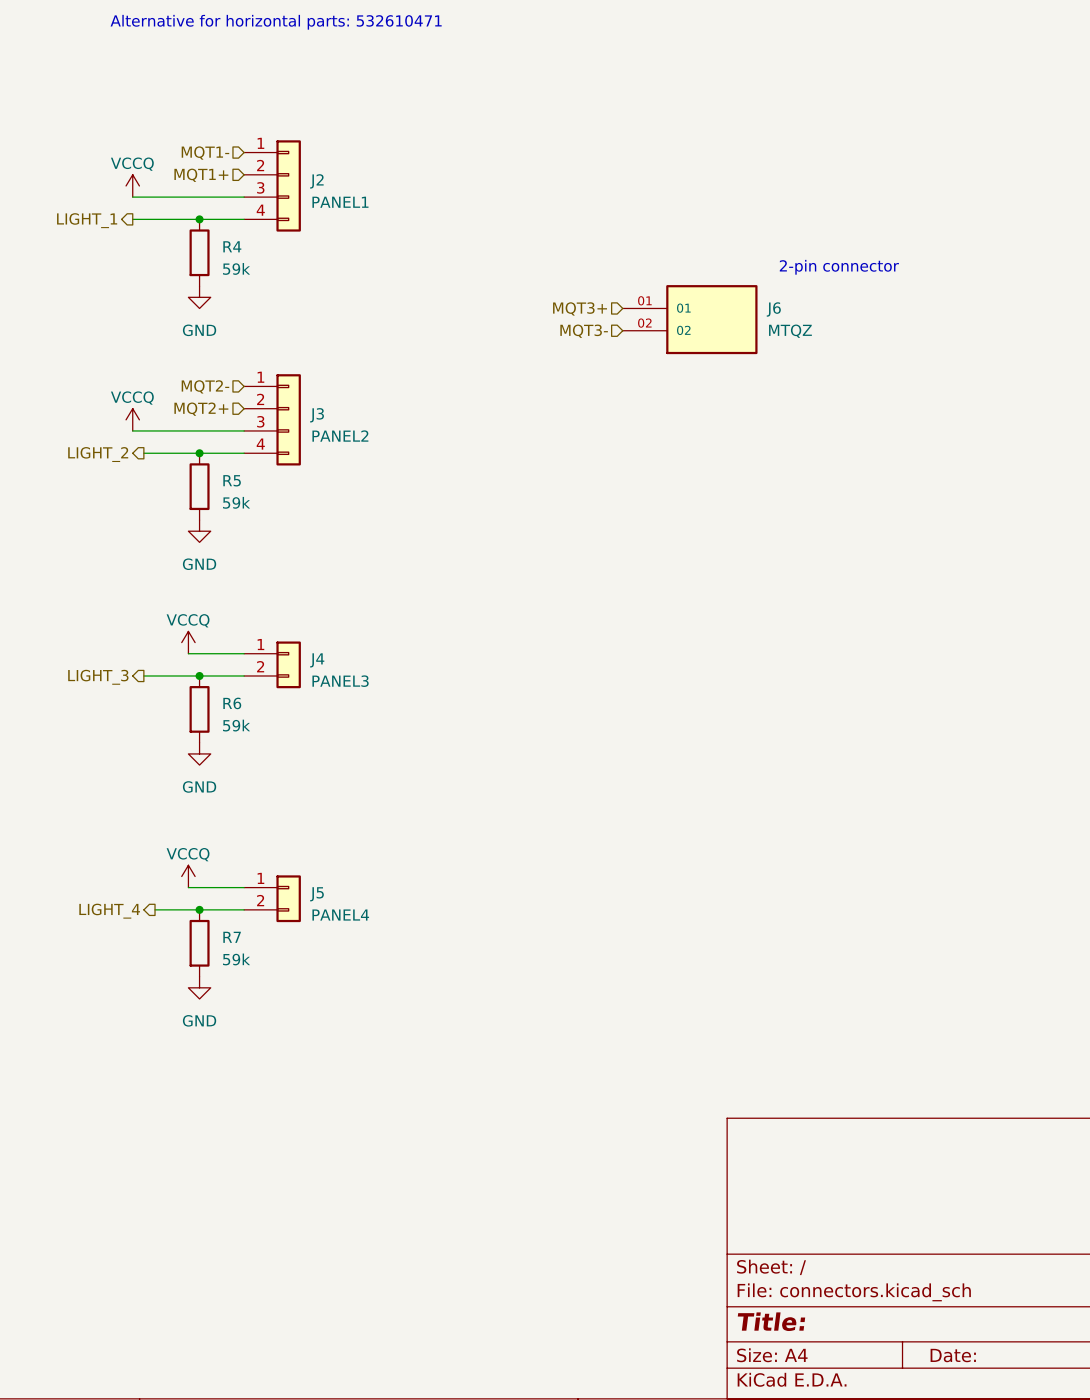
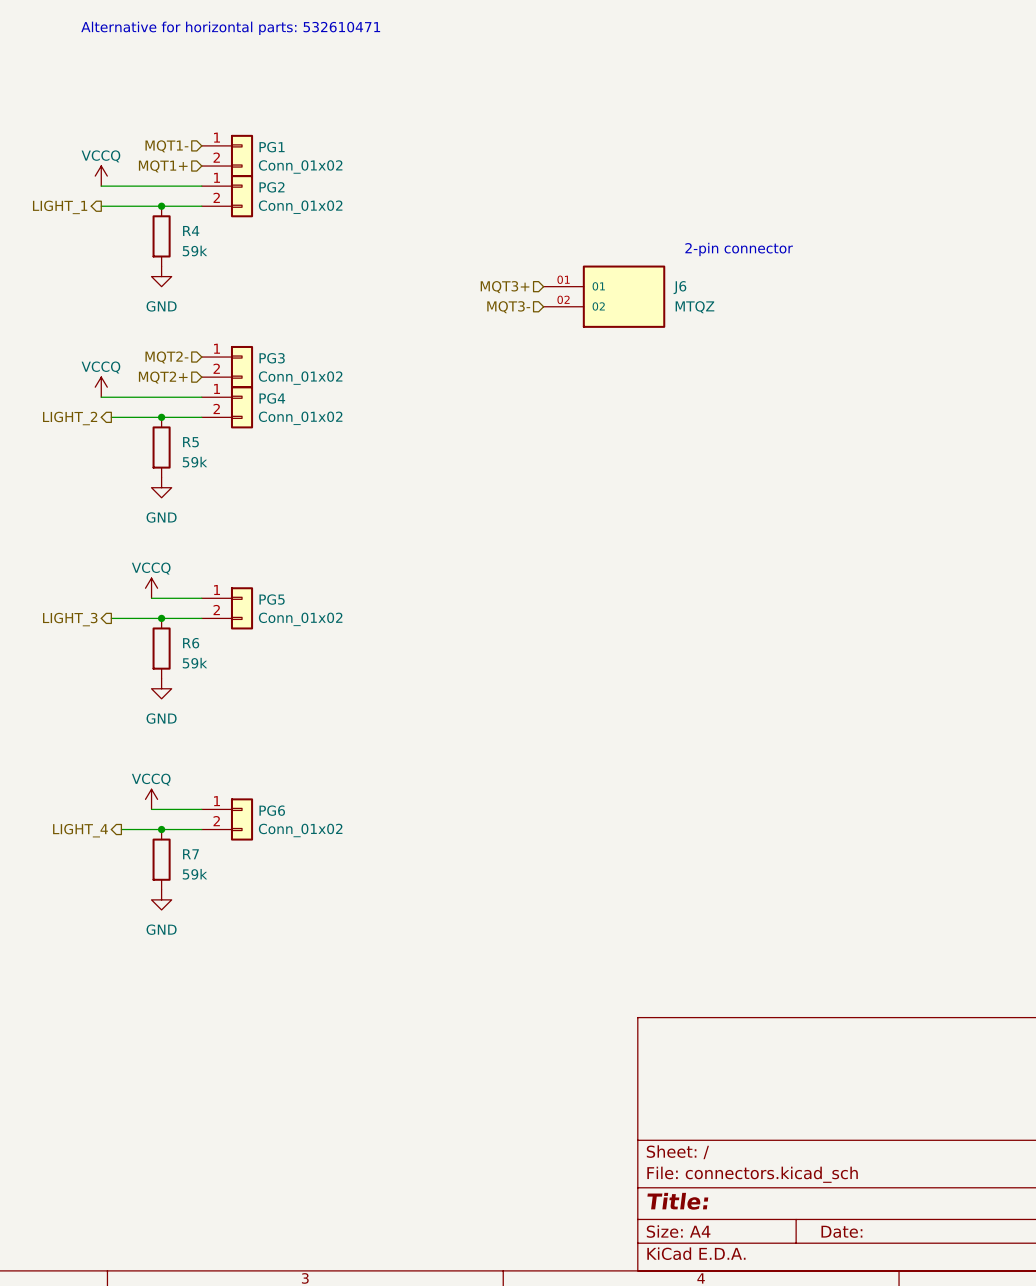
PG1: none -> Conn_01x02 (227, 155)
J2: PANEL1 (272, 185) -> none
PG2: none -> Conn_01x02 (227, 196)
PG3: none -> Conn_01x02 (227, 367)
J3: PANEL2 (272, 419) -> none
PG4: none -> Conn_01x02 (227, 407)
J4 name: J4 (317, 660) -> PG5 (272, 599)
J4 value: PANEL3 (340, 681) -> Conn_01x02 (300, 619)
J5 name: J5 (316, 894) -> PG6 (272, 810)
J5 value: PANEL4 (340, 915) -> Conn_01x02 (300, 830)

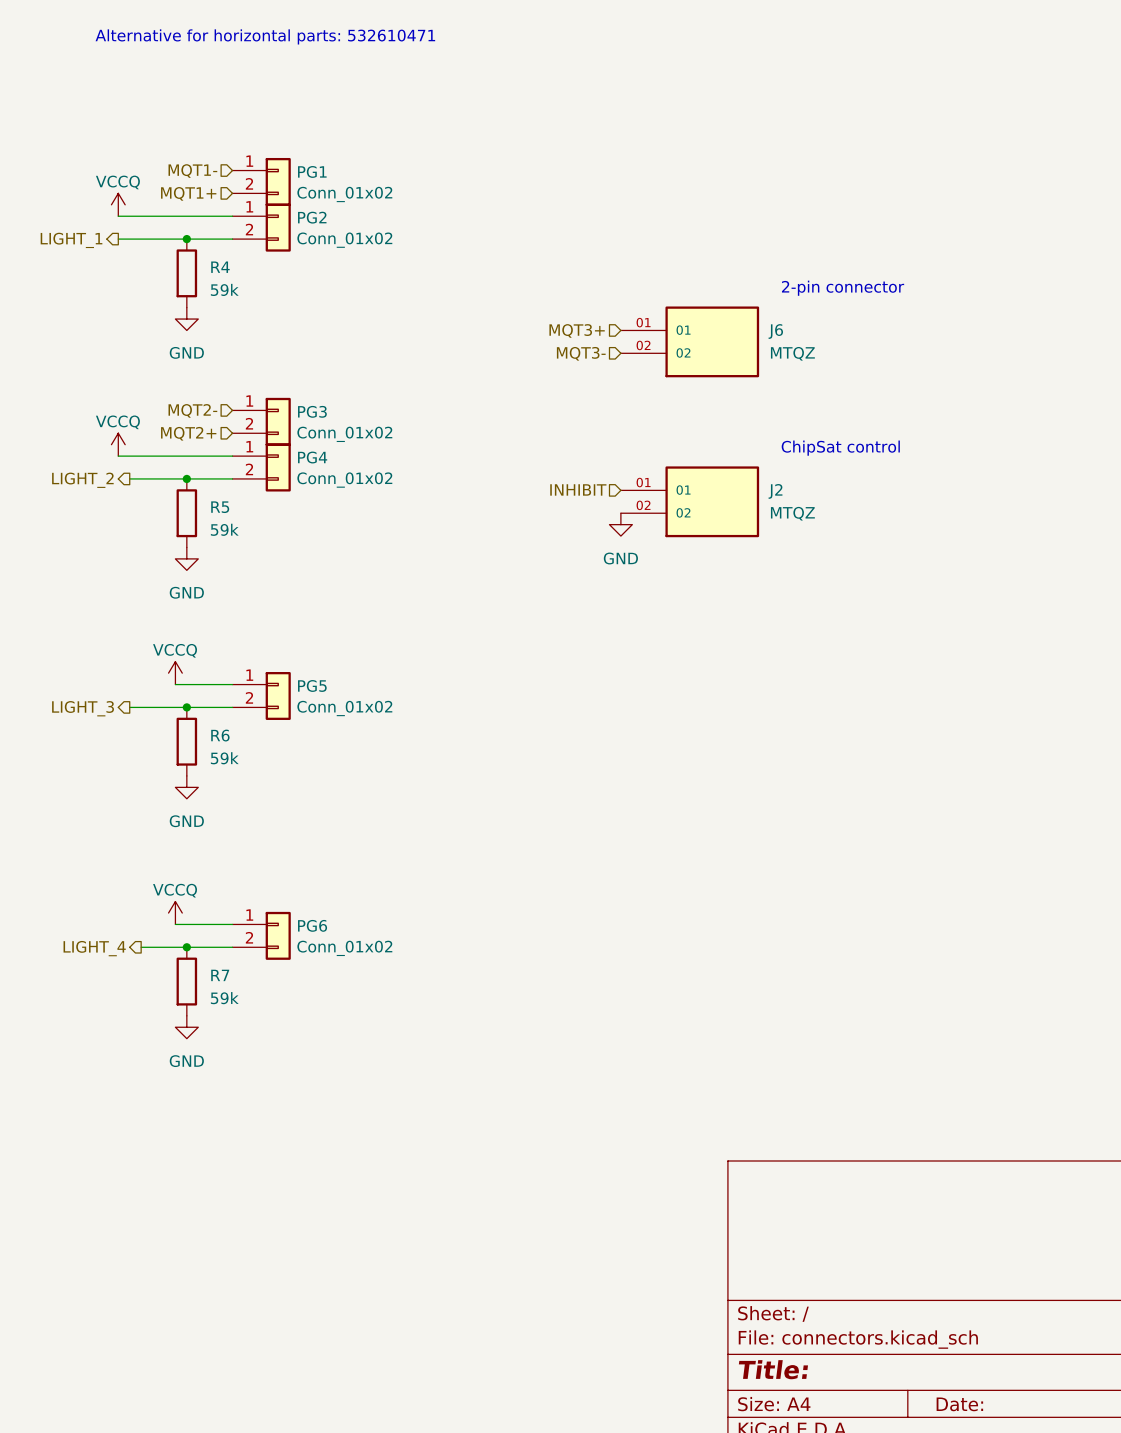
text: none -> ChipSat control (840, 448)
hierarchical label: none -> INHIBIT (578, 489)
J2: none -> MTQZ (690, 501)
power symbol: none -> GND (620, 524)

